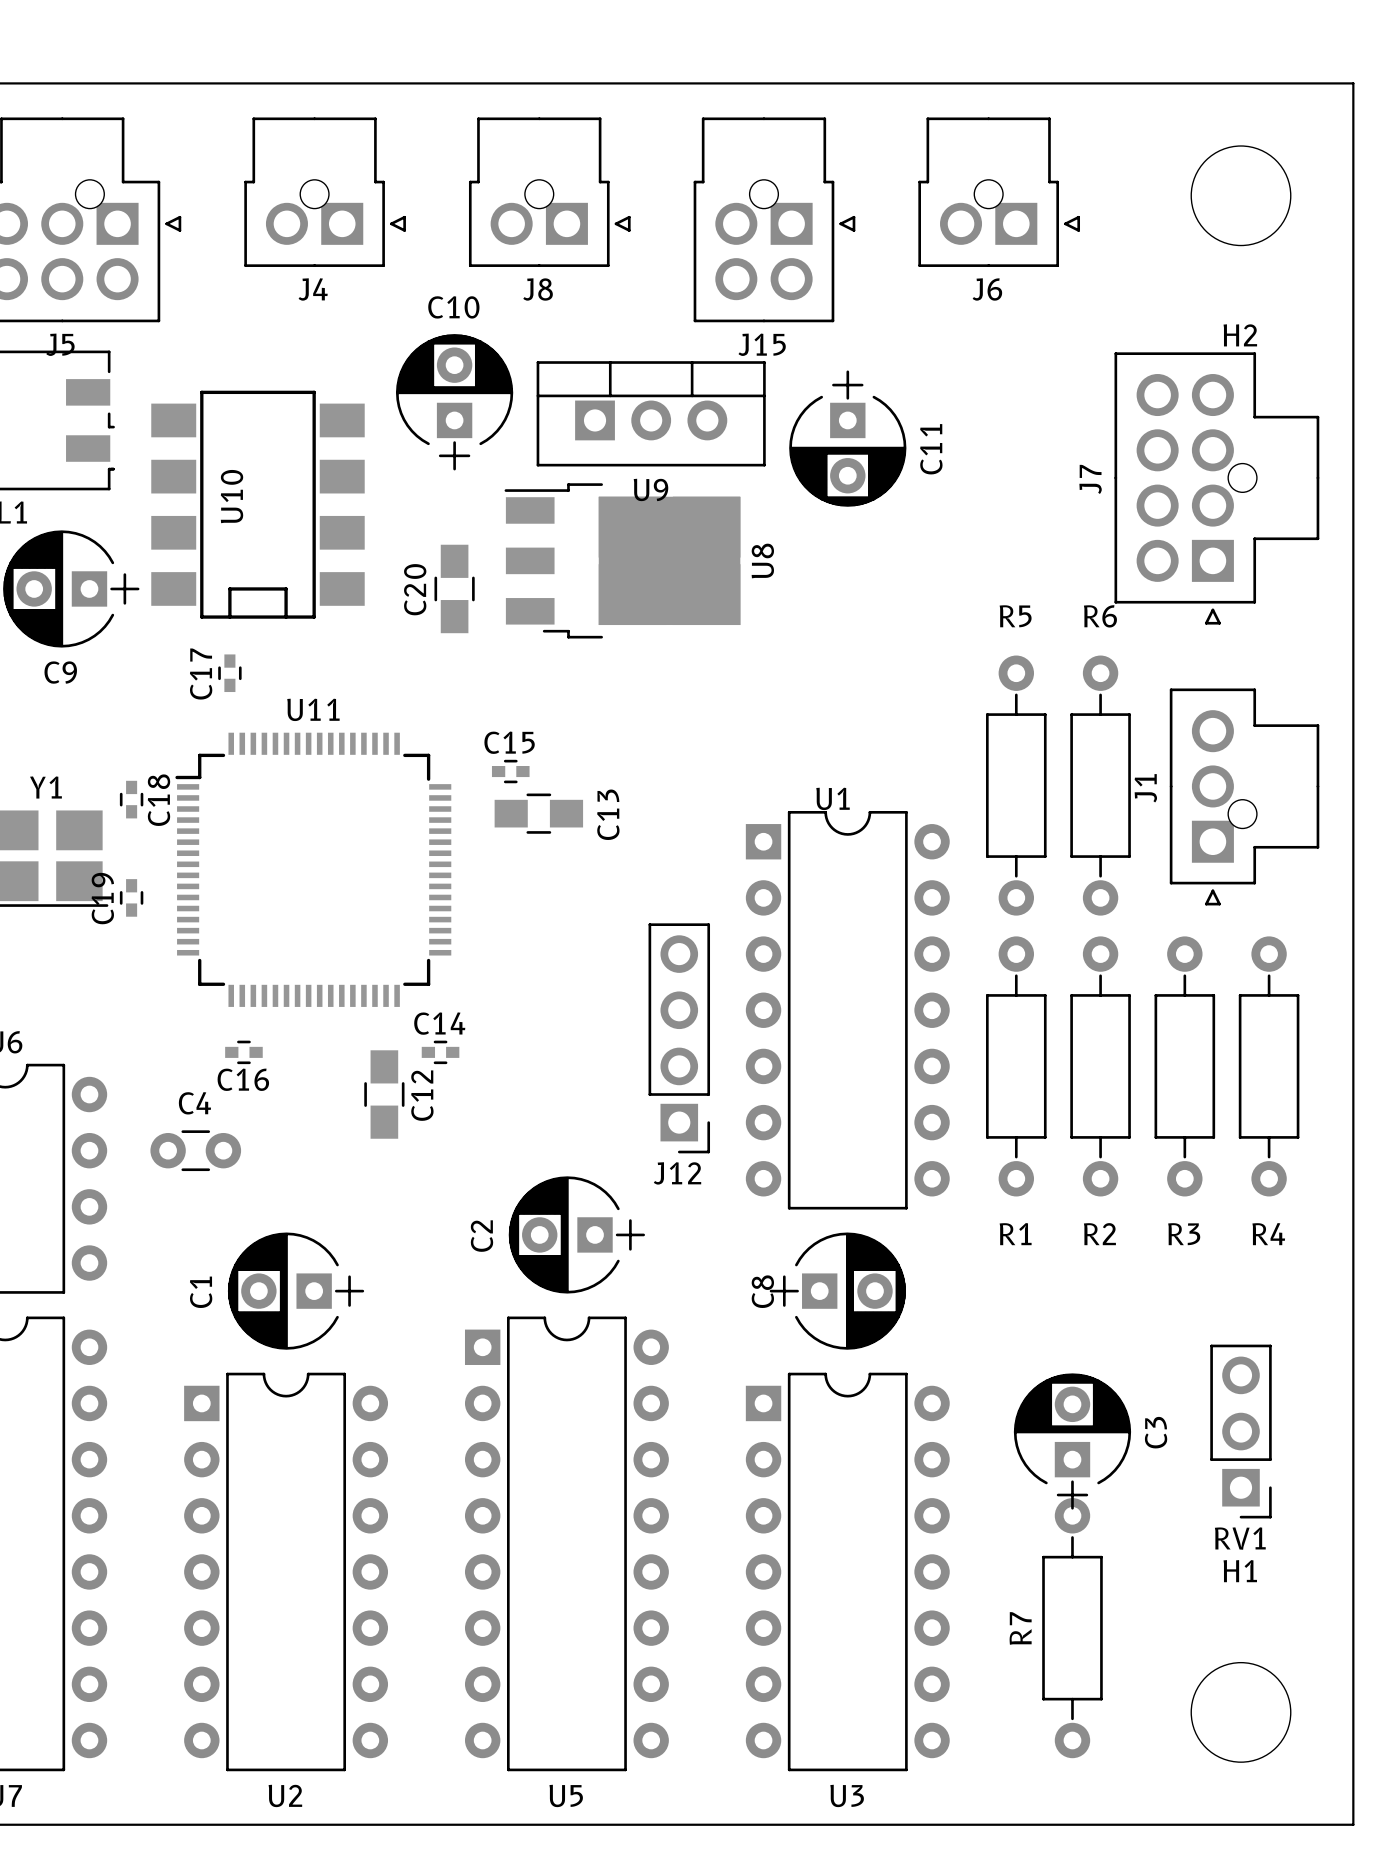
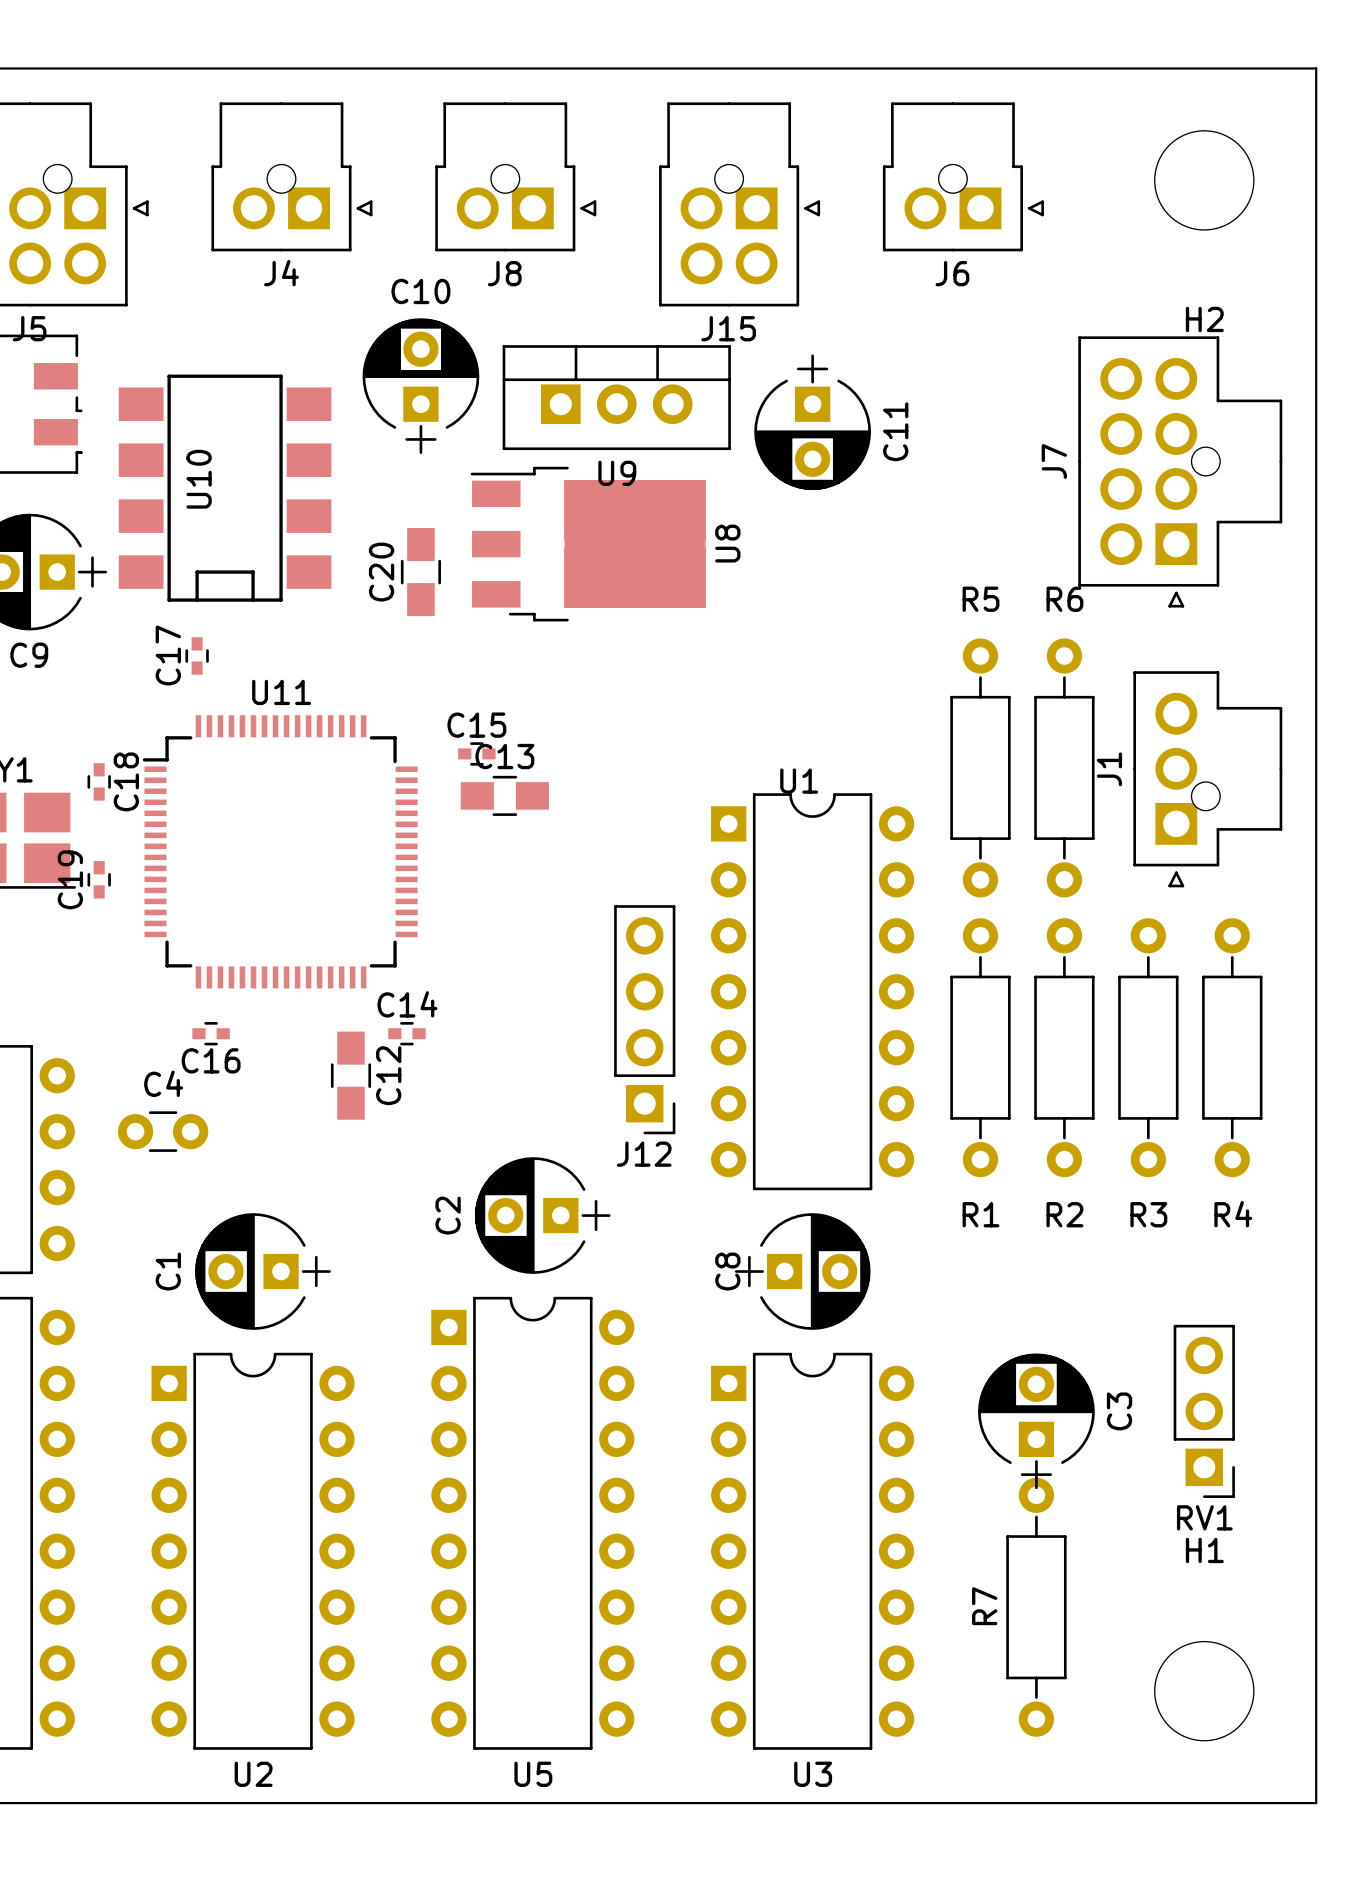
C13 name rotation: 0° (608, 814) -> 90° clockwise (504, 756)
C13 name position: C13 (608, 814) -> C13 (504, 756)

